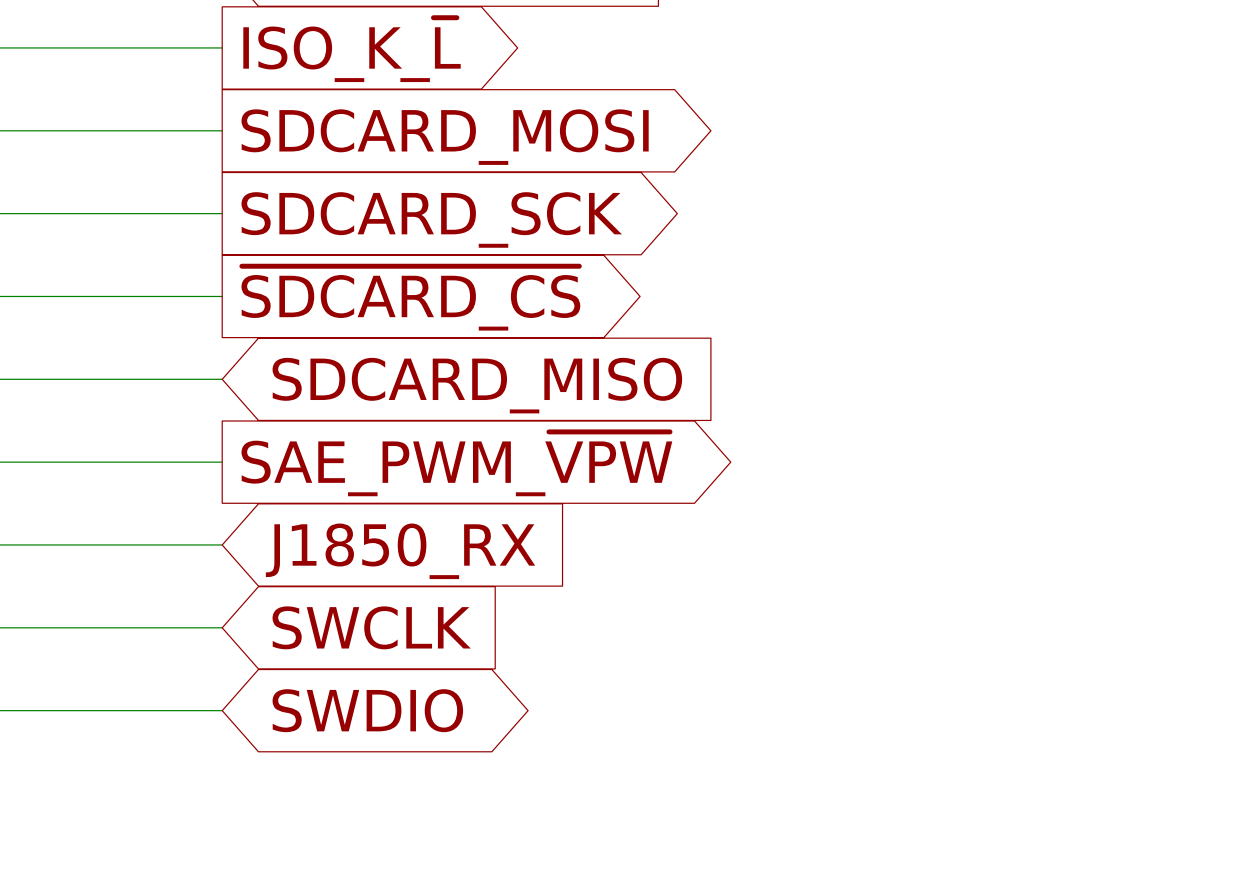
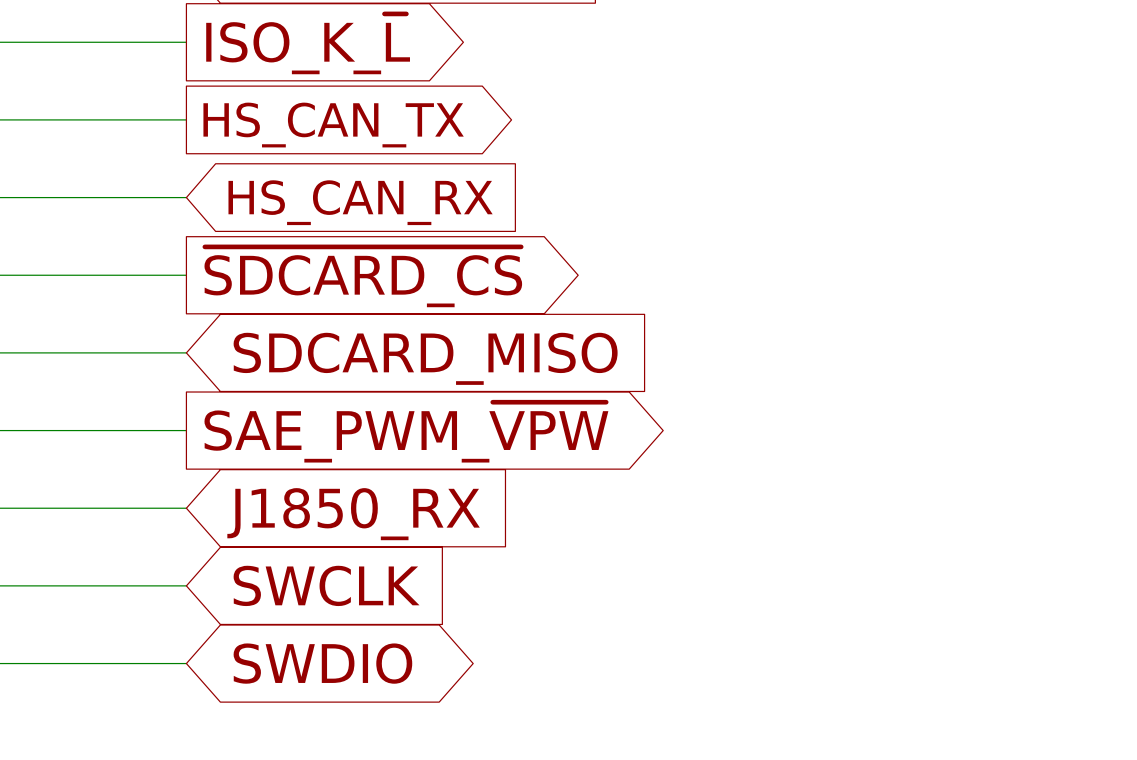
global label: SDCARD_MOSI (445, 137) -> HS_CAN_TX (333, 125)
global label shape: output (431, 219) -> input (360, 202)
global label: SDCARD_SCK (431, 219) -> HS_CAN_RX (360, 202)

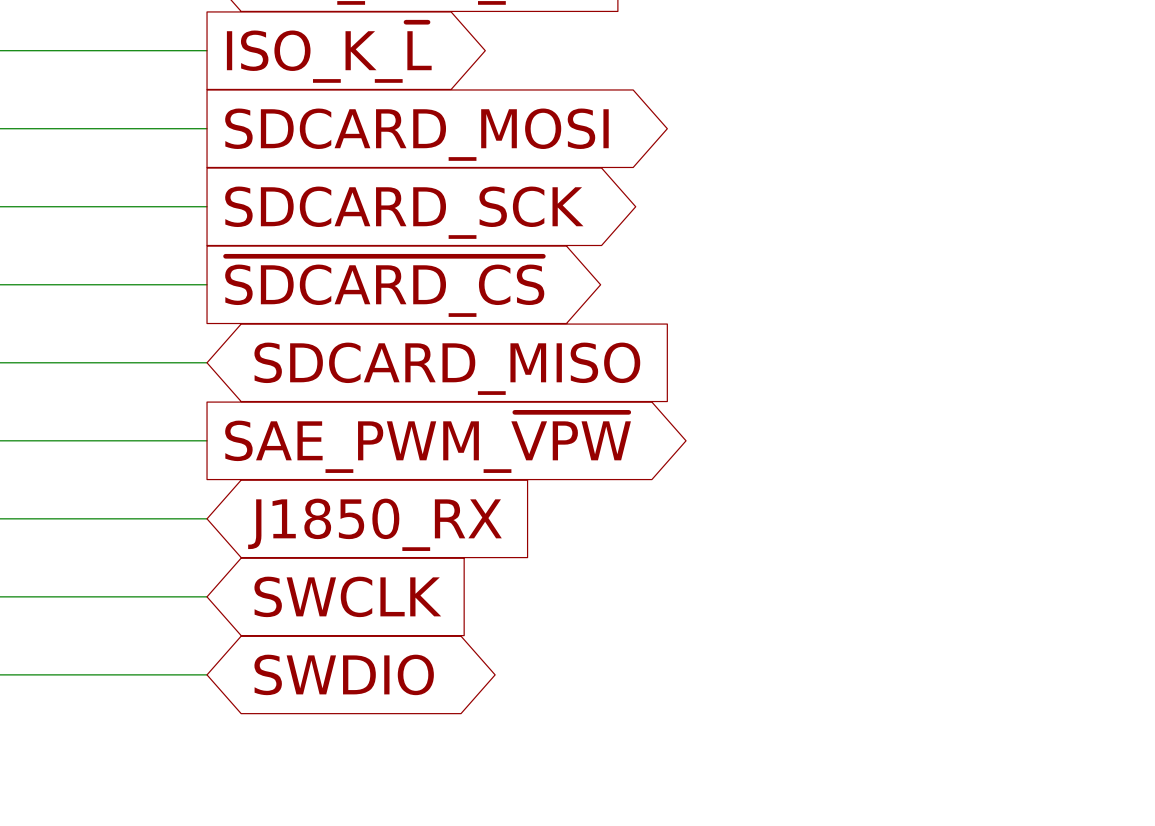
global label: HS_CAN_TX (333, 125) -> SDCARD_MOSI (416, 134)
global label shape: input (360, 202) -> output (404, 212)
global label: HS_CAN_RX (360, 202) -> SDCARD_SCK (404, 212)

